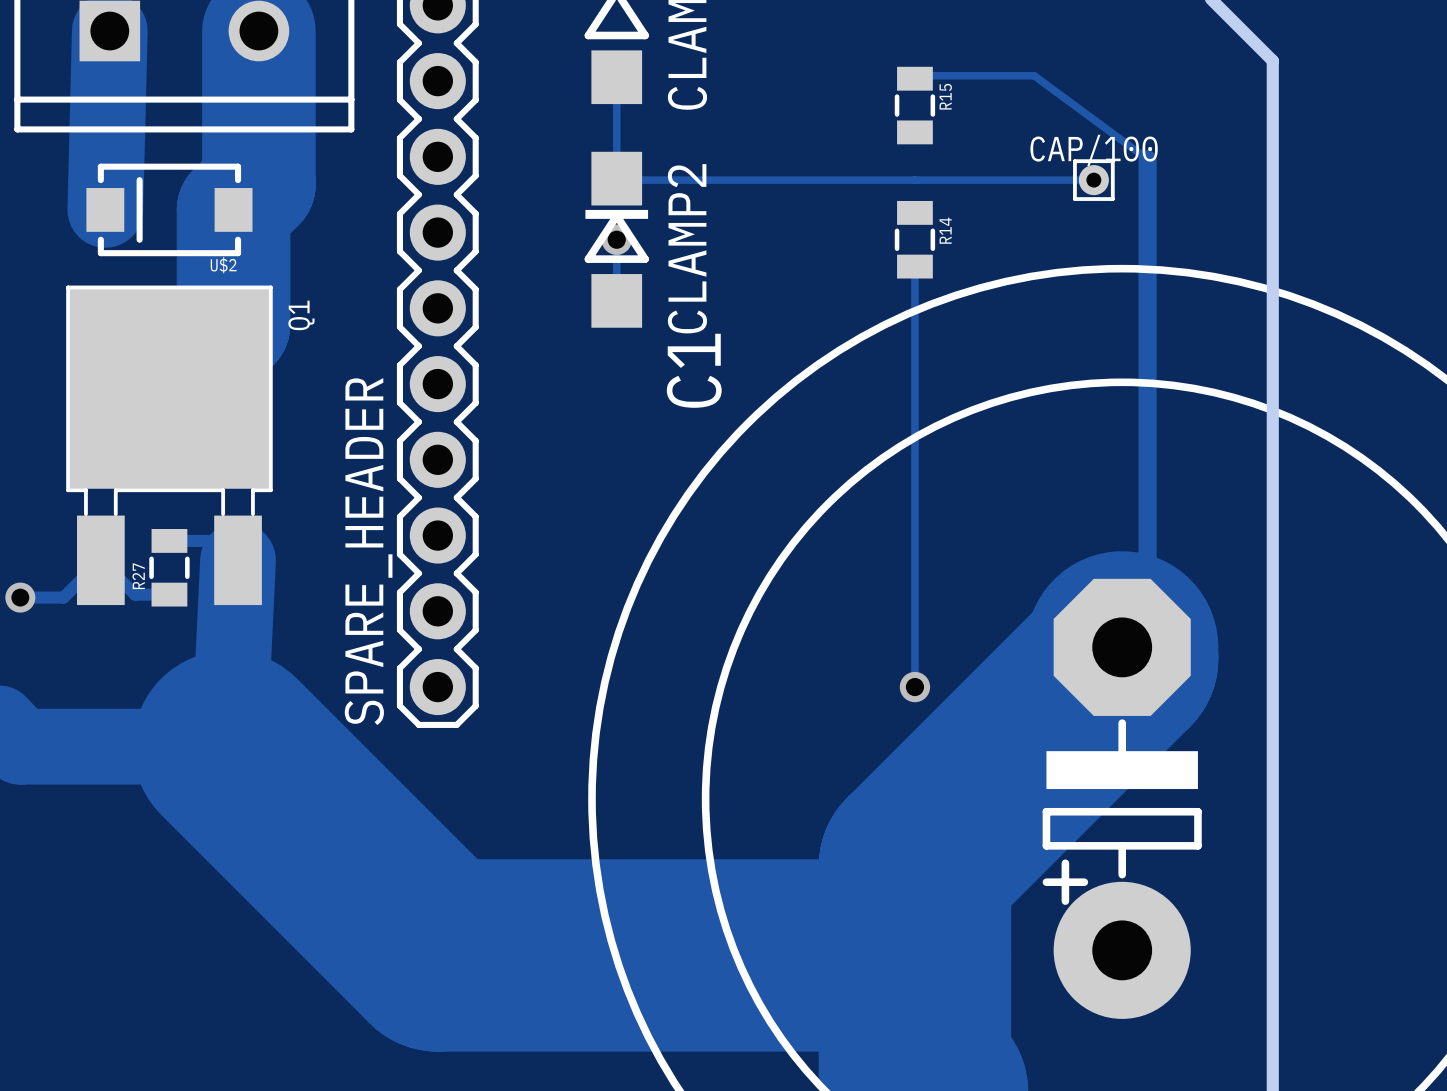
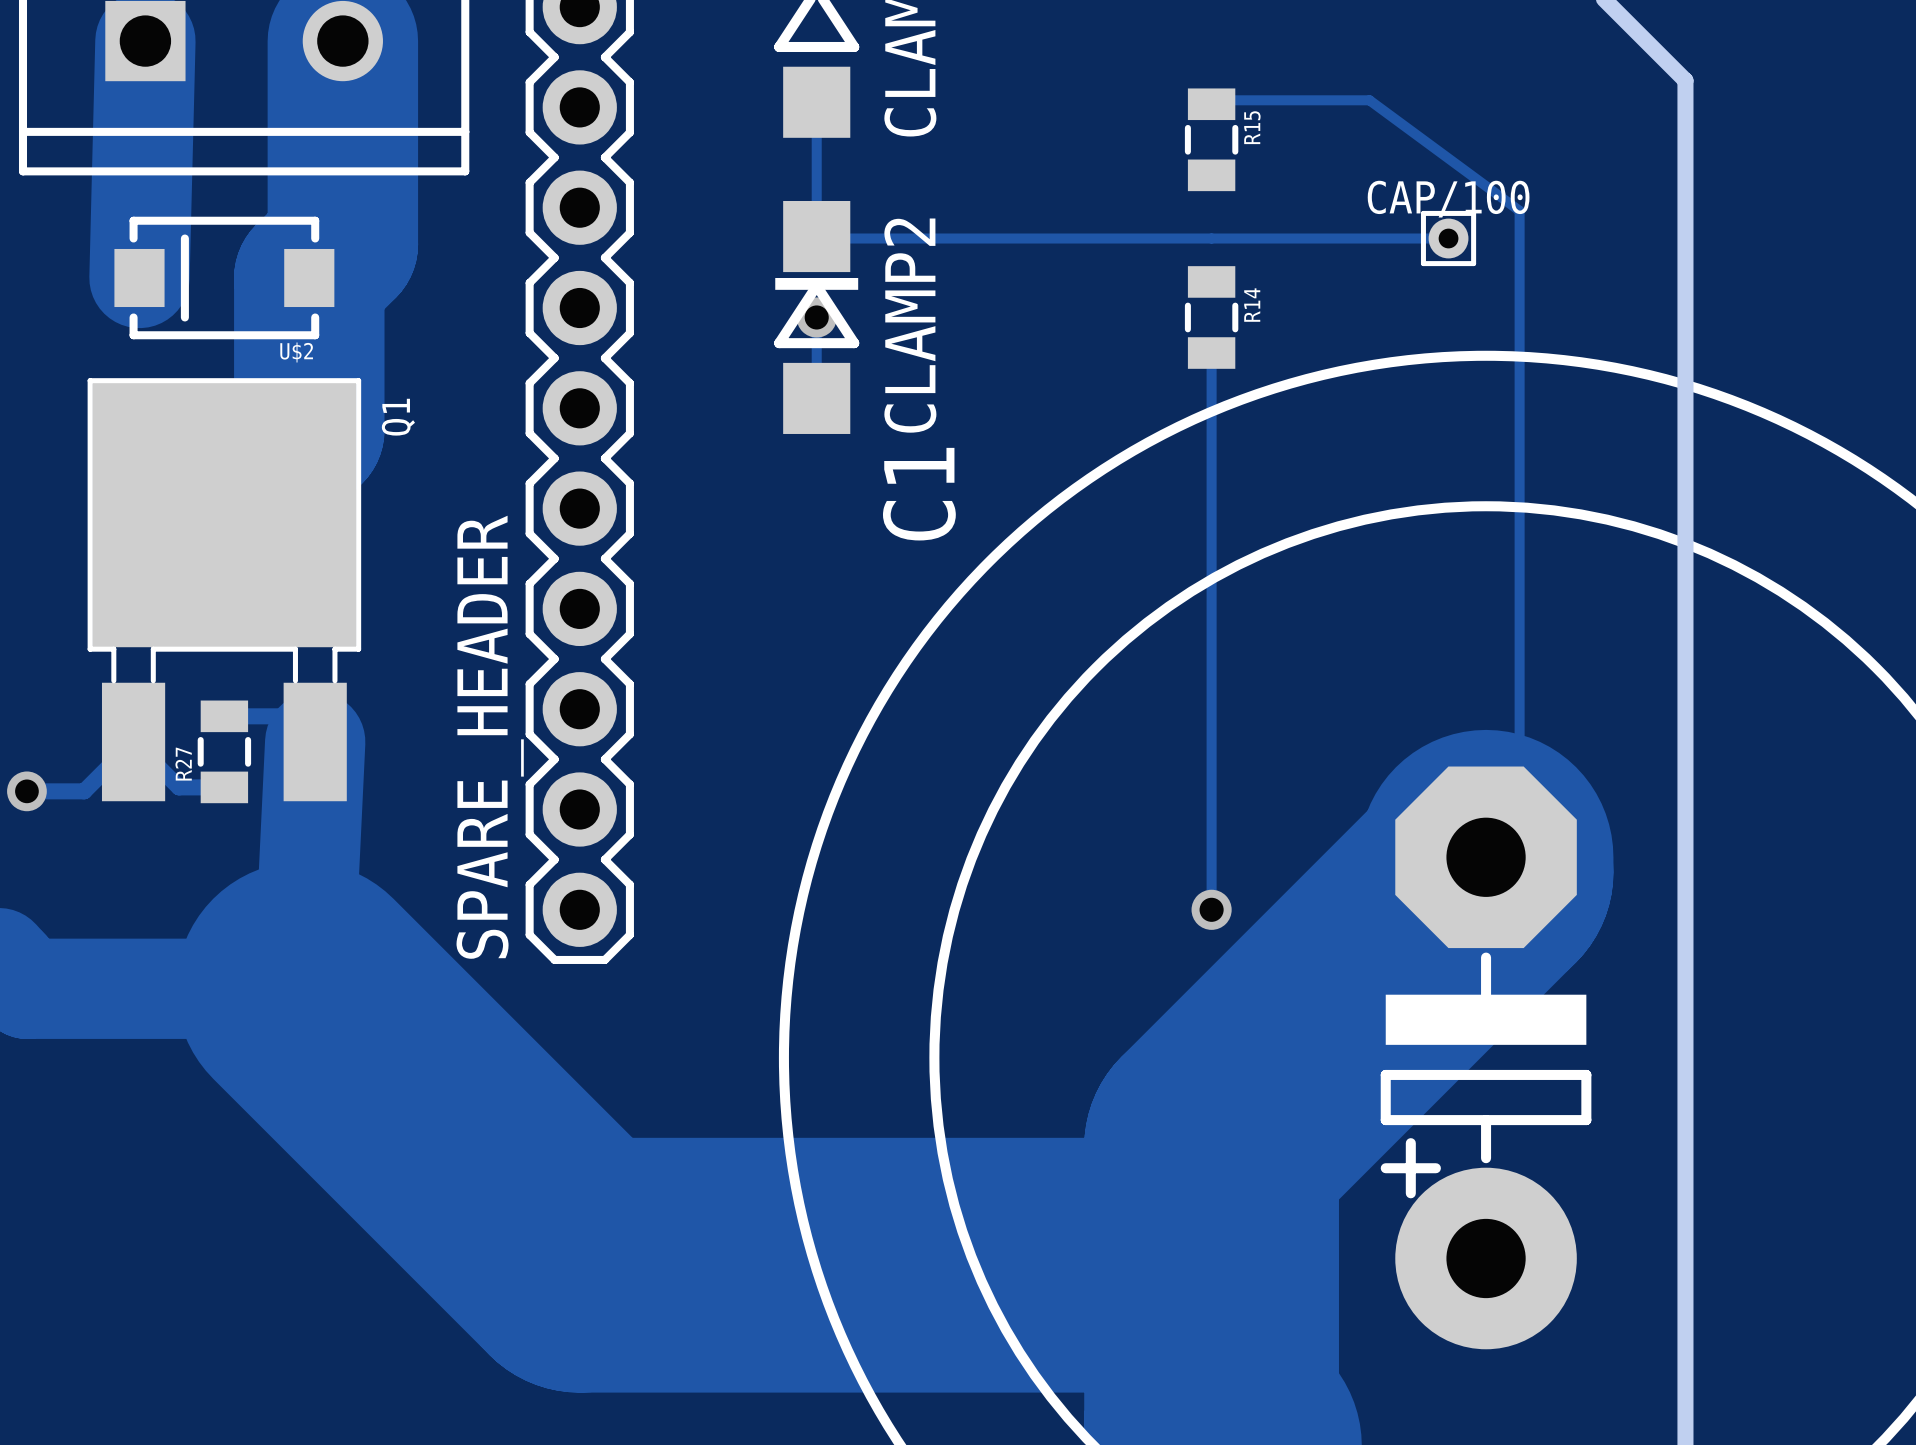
track width: thick (1147, 159) (1147, 564) -> thin (1519, 210) (1519, 747)

